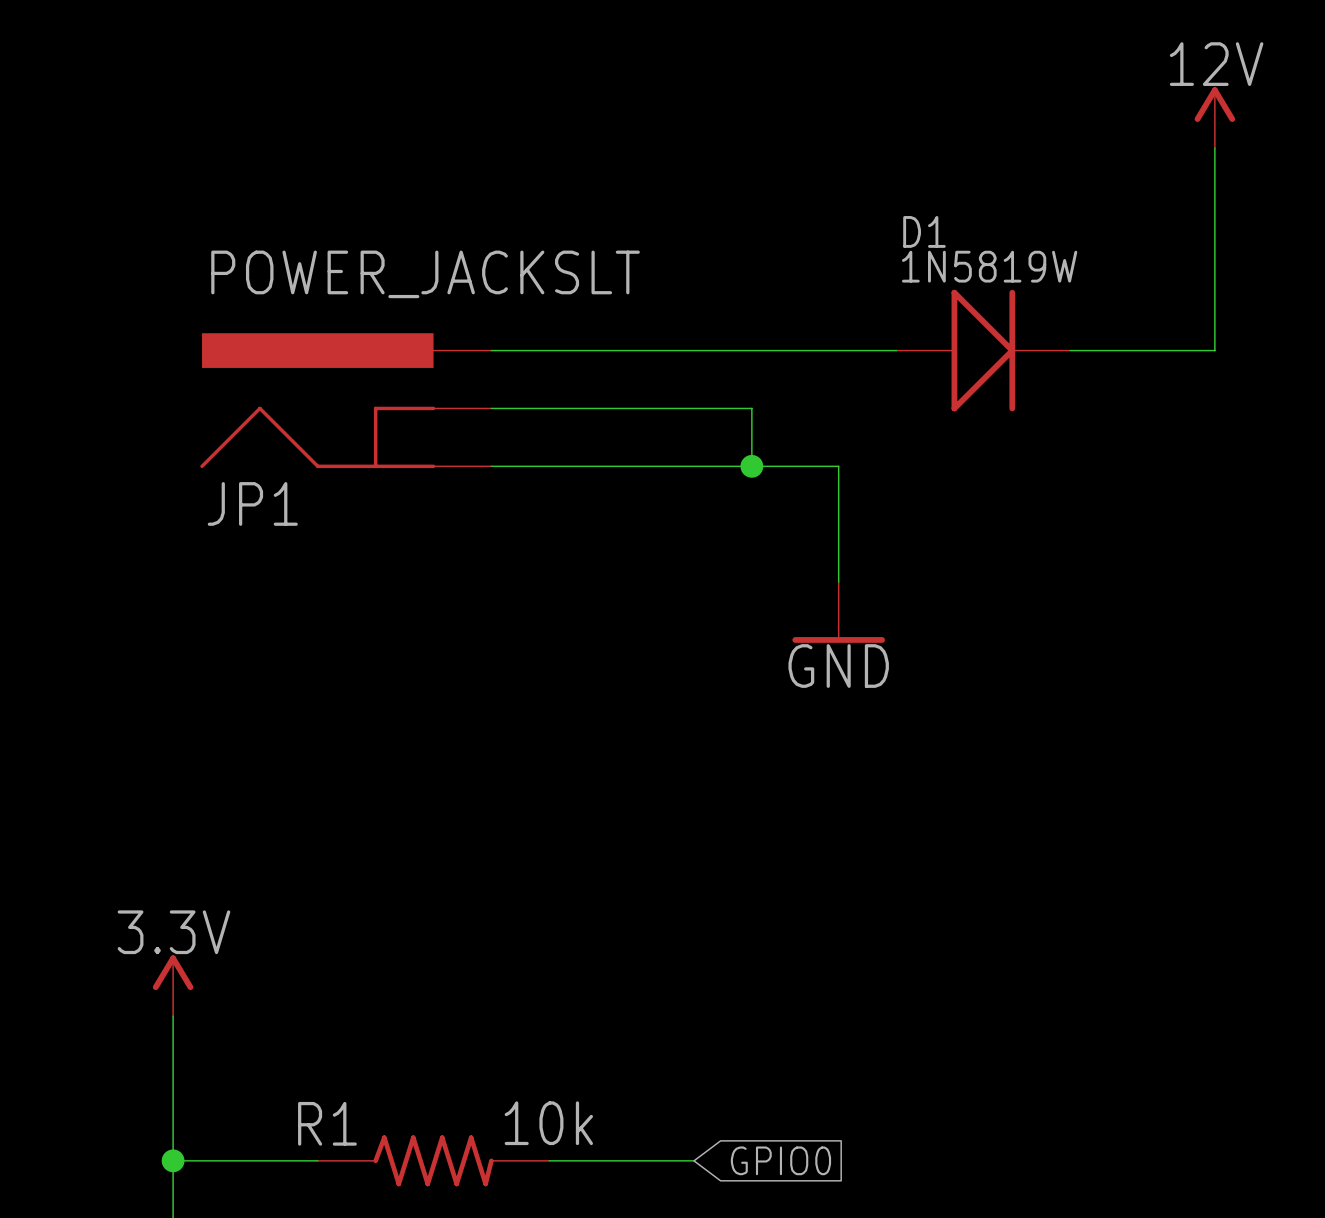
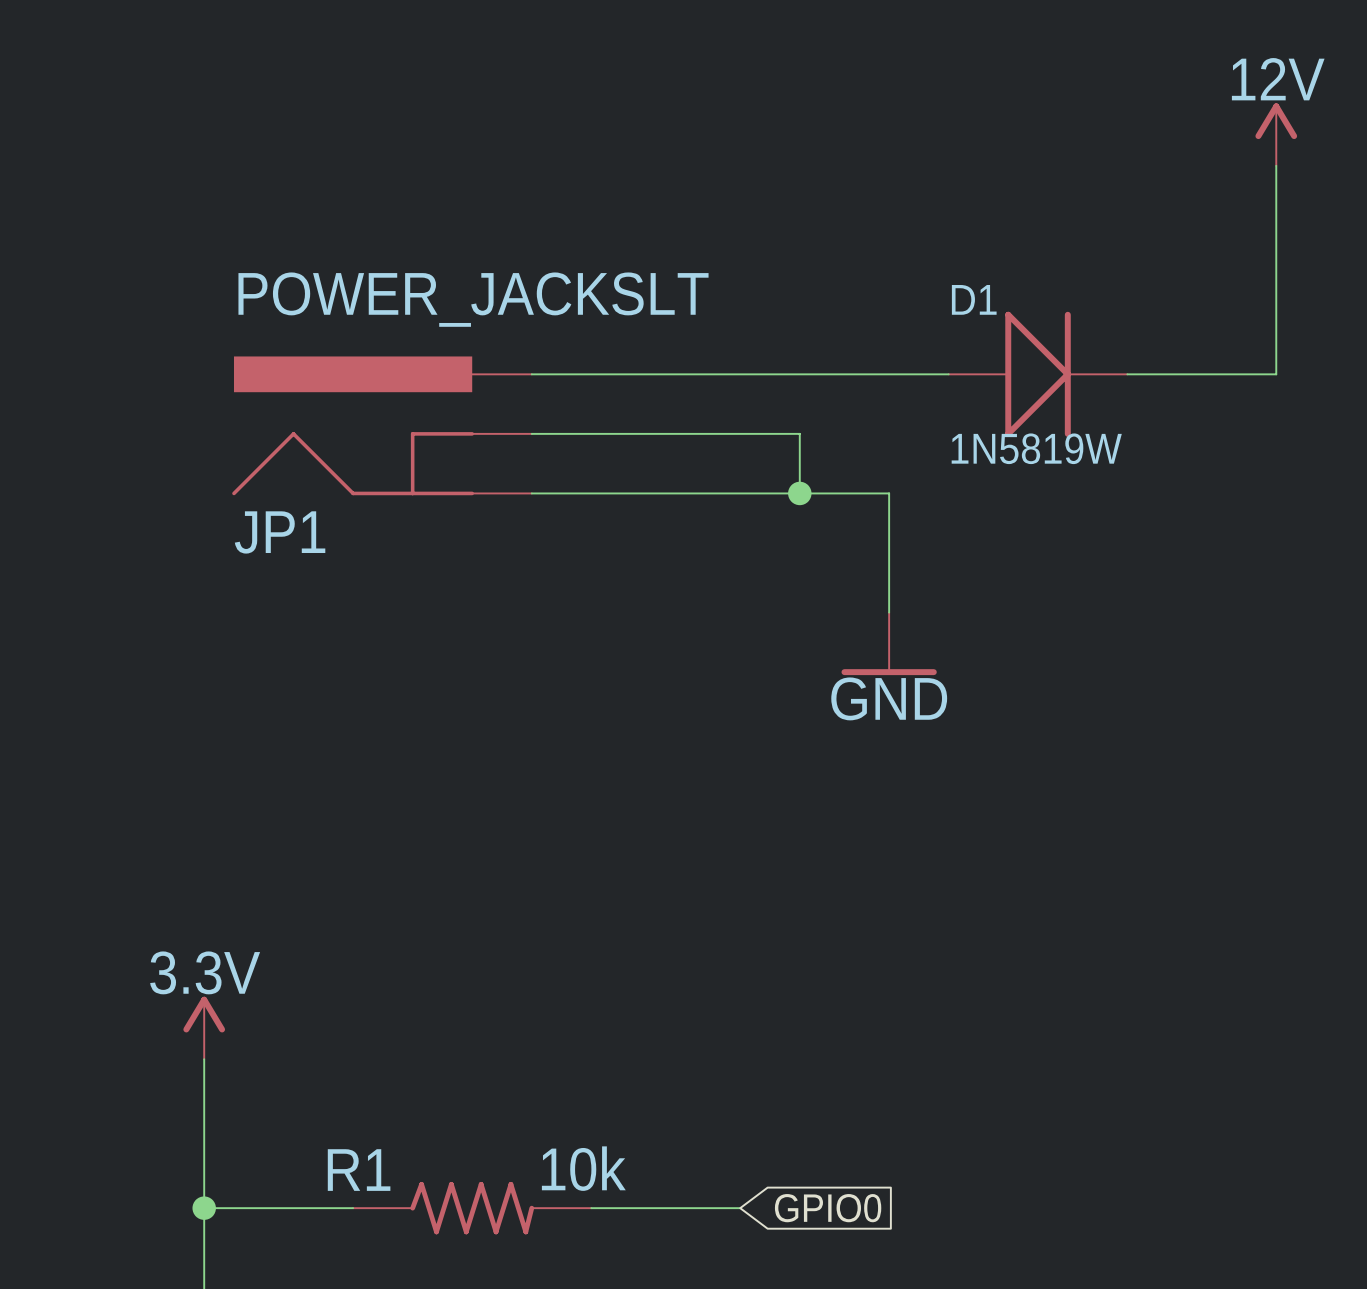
D1 name position: D1 (924, 231) -> D1 (974, 299)
D1 value position: 1N5819W (989, 266) -> 1N5819W (1036, 448)

